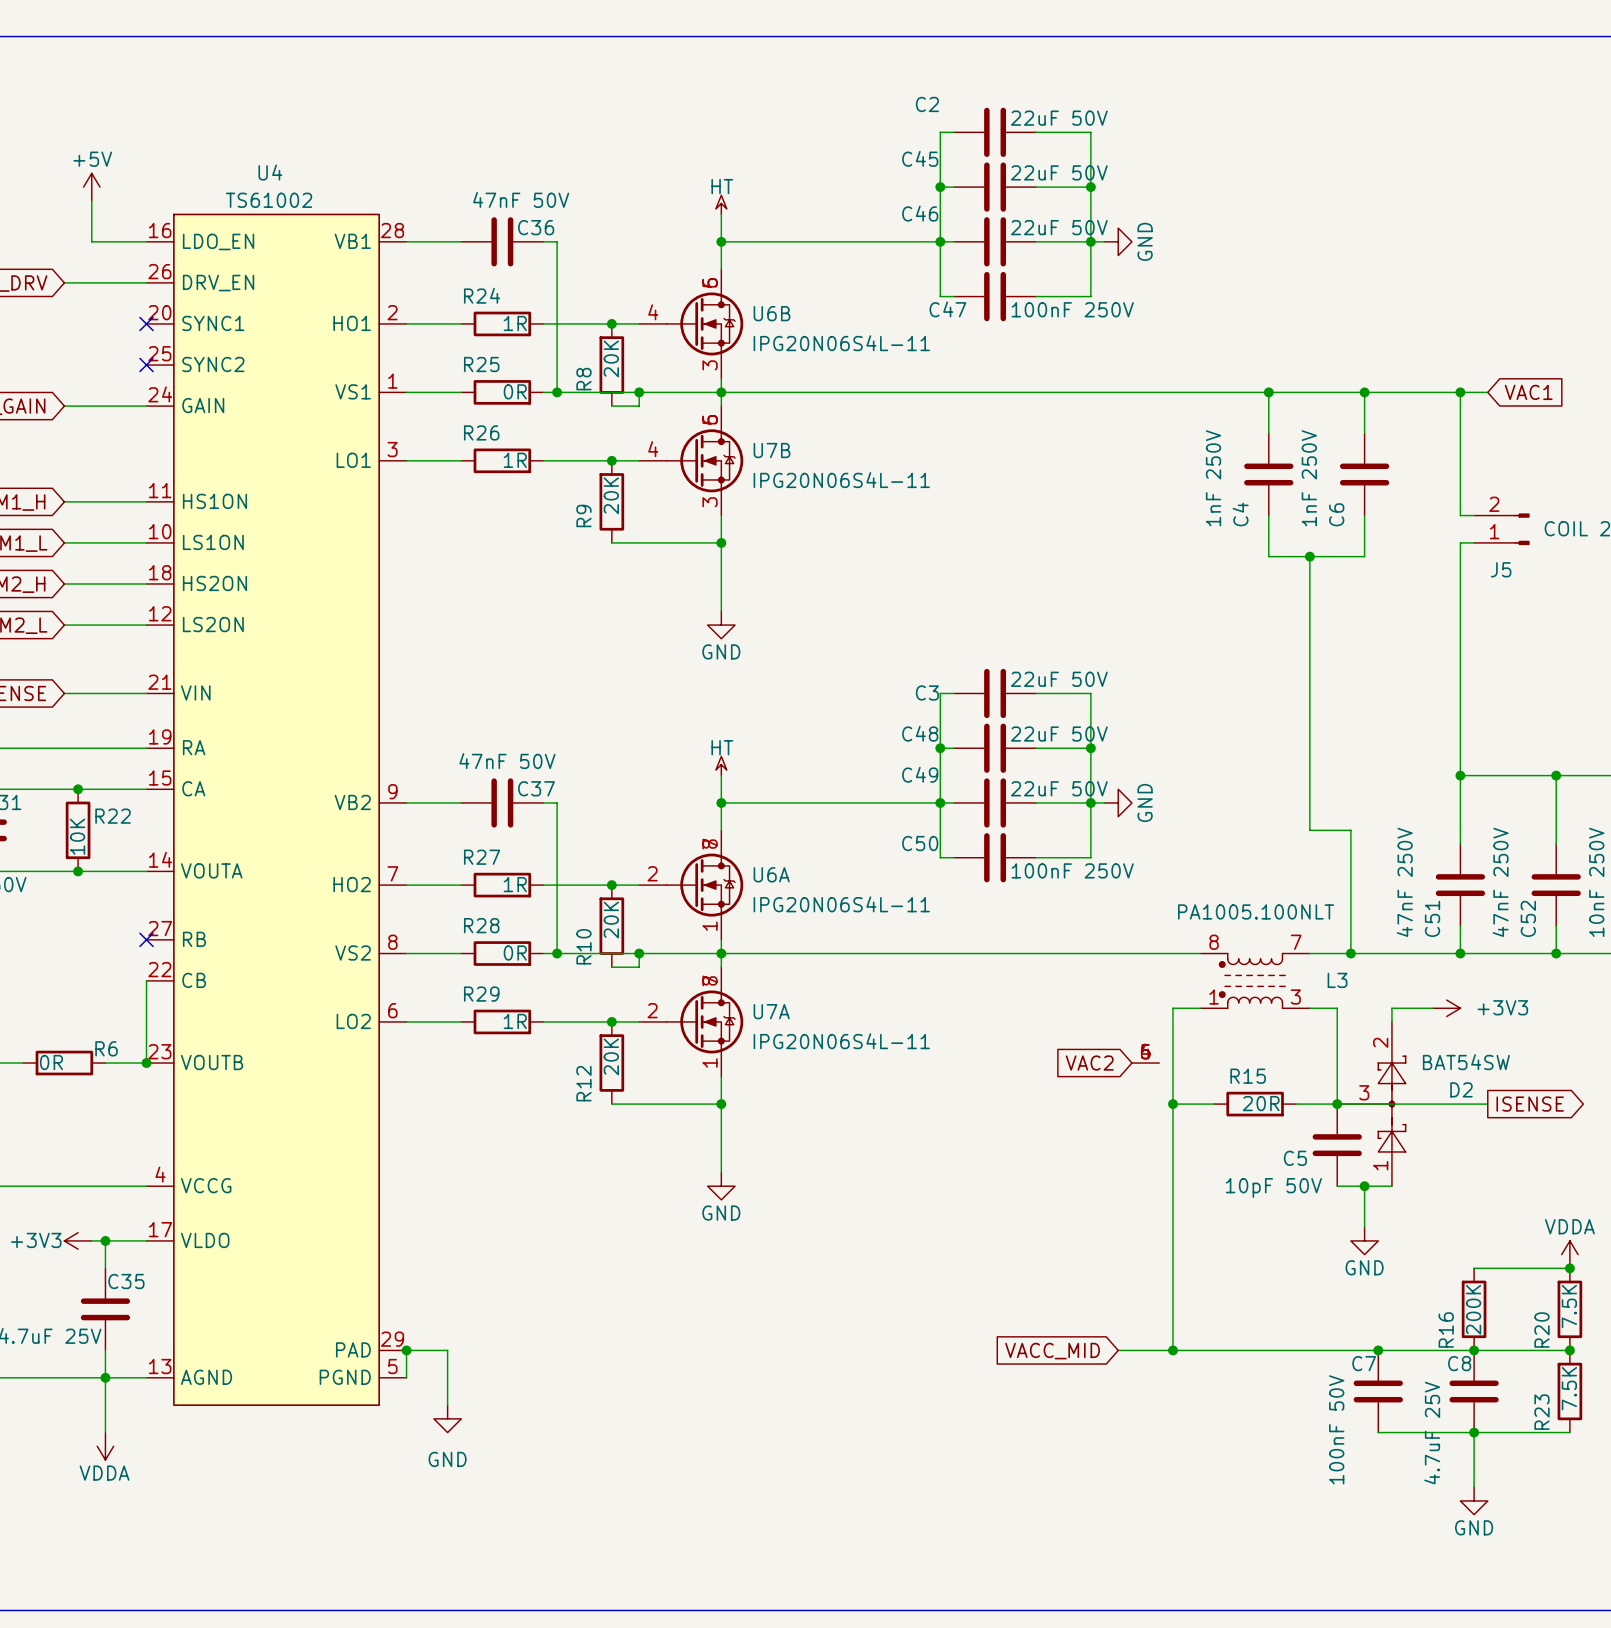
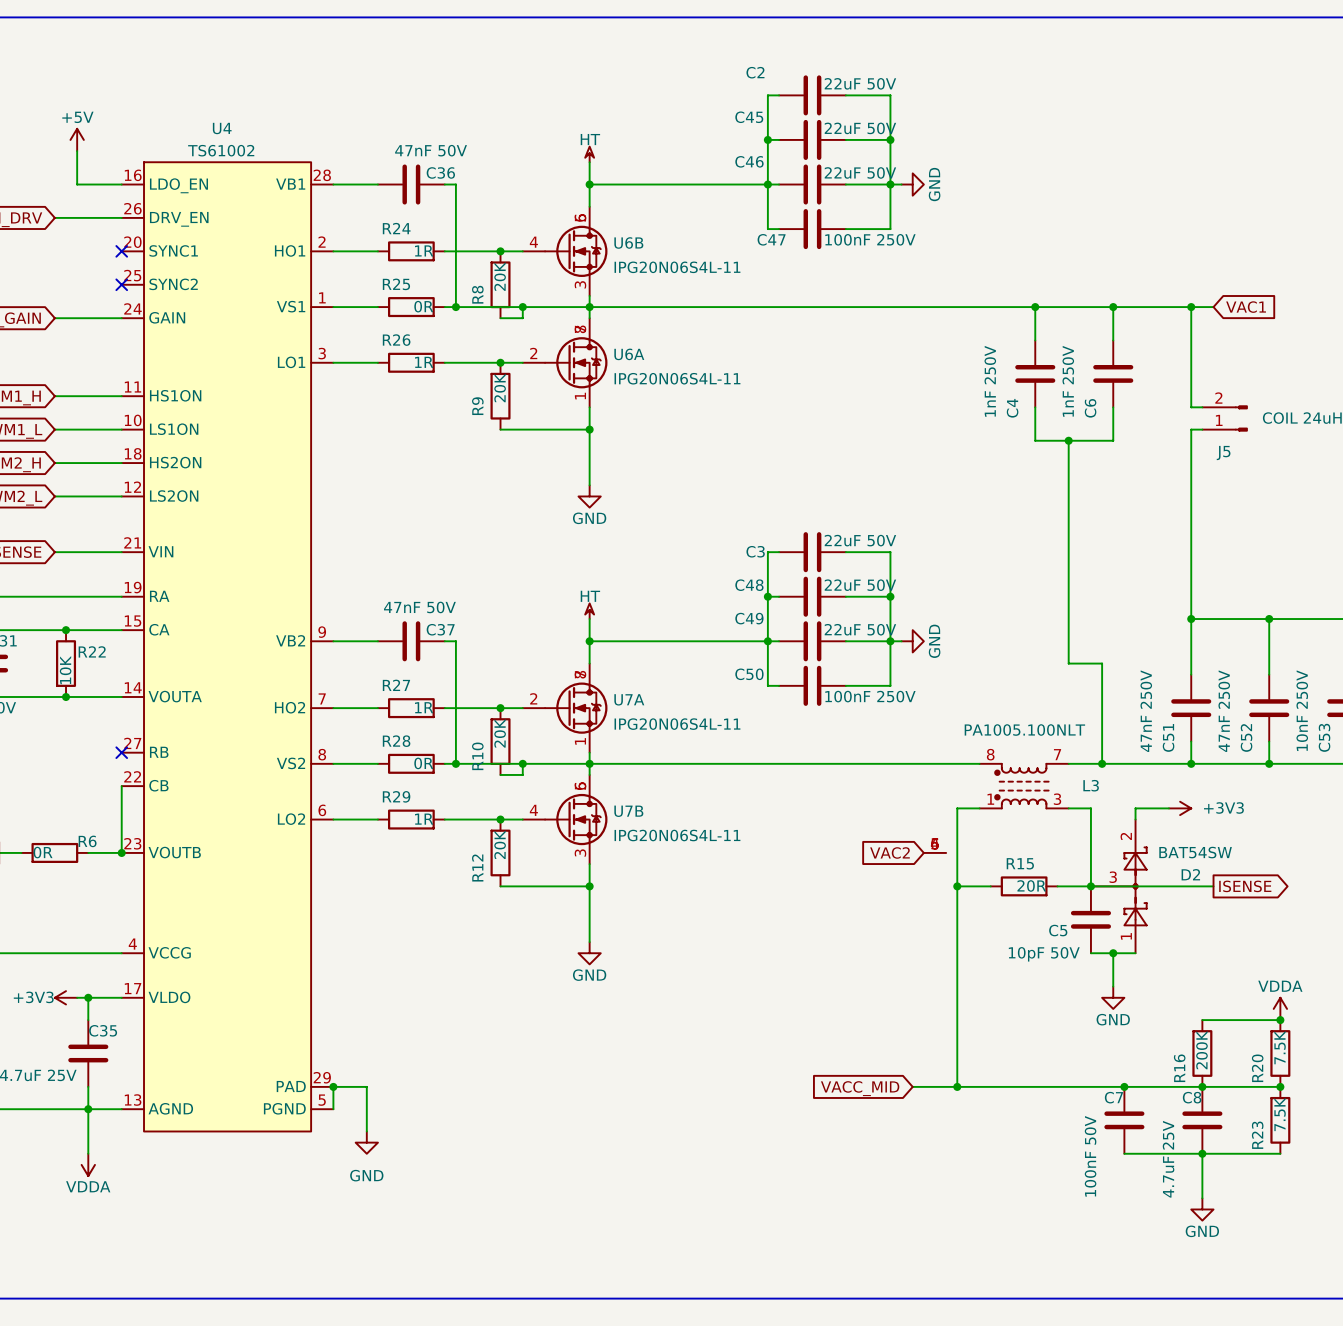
U7B position: (691, 460) -> (565, 819)
U6A: none -> IPG20N06S4L-11 (565, 362)
U6A name: U6A (771, 874) -> U7A (629, 699)
U7A: IPG20N06S4L-11 (691, 1021) -> none

